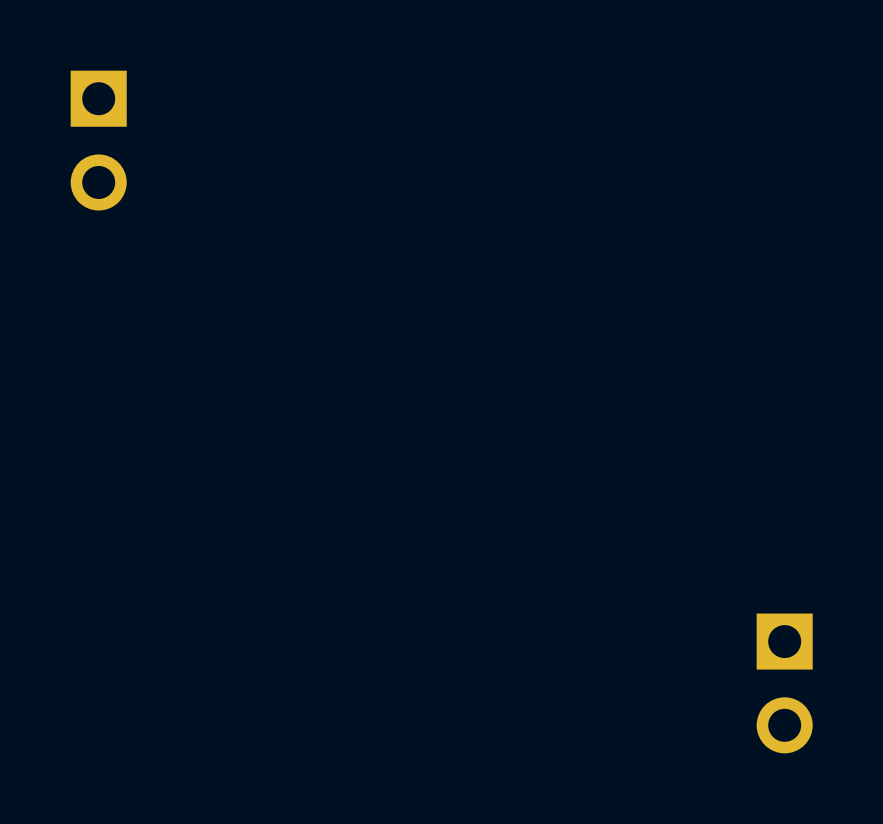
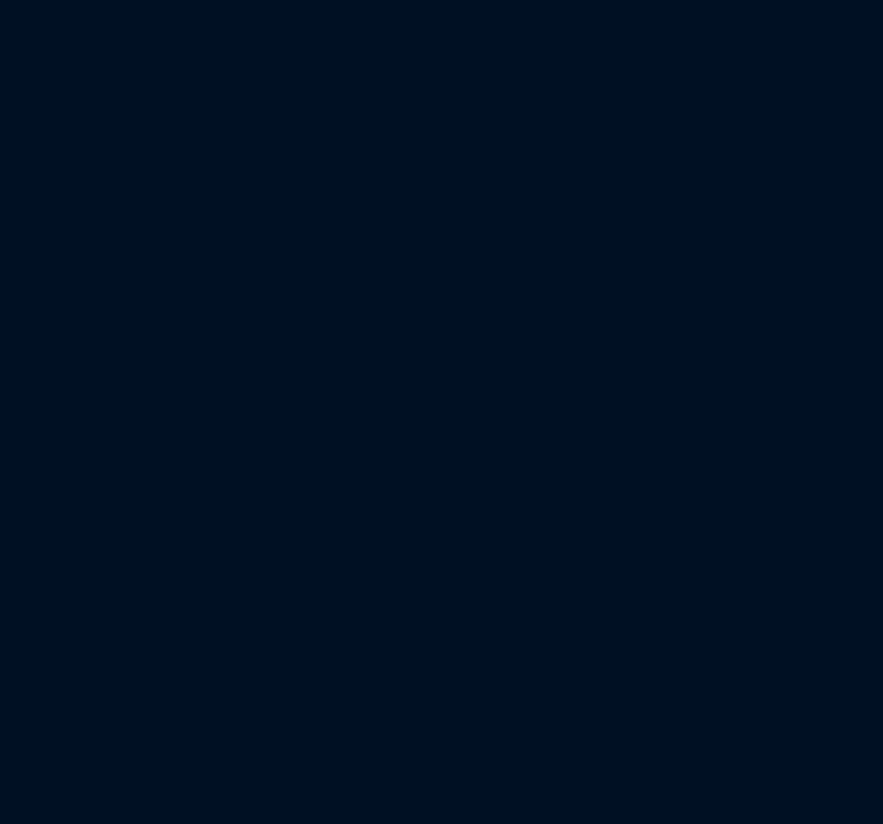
part: (98, 140) -> none
part: (784, 683) -> none

